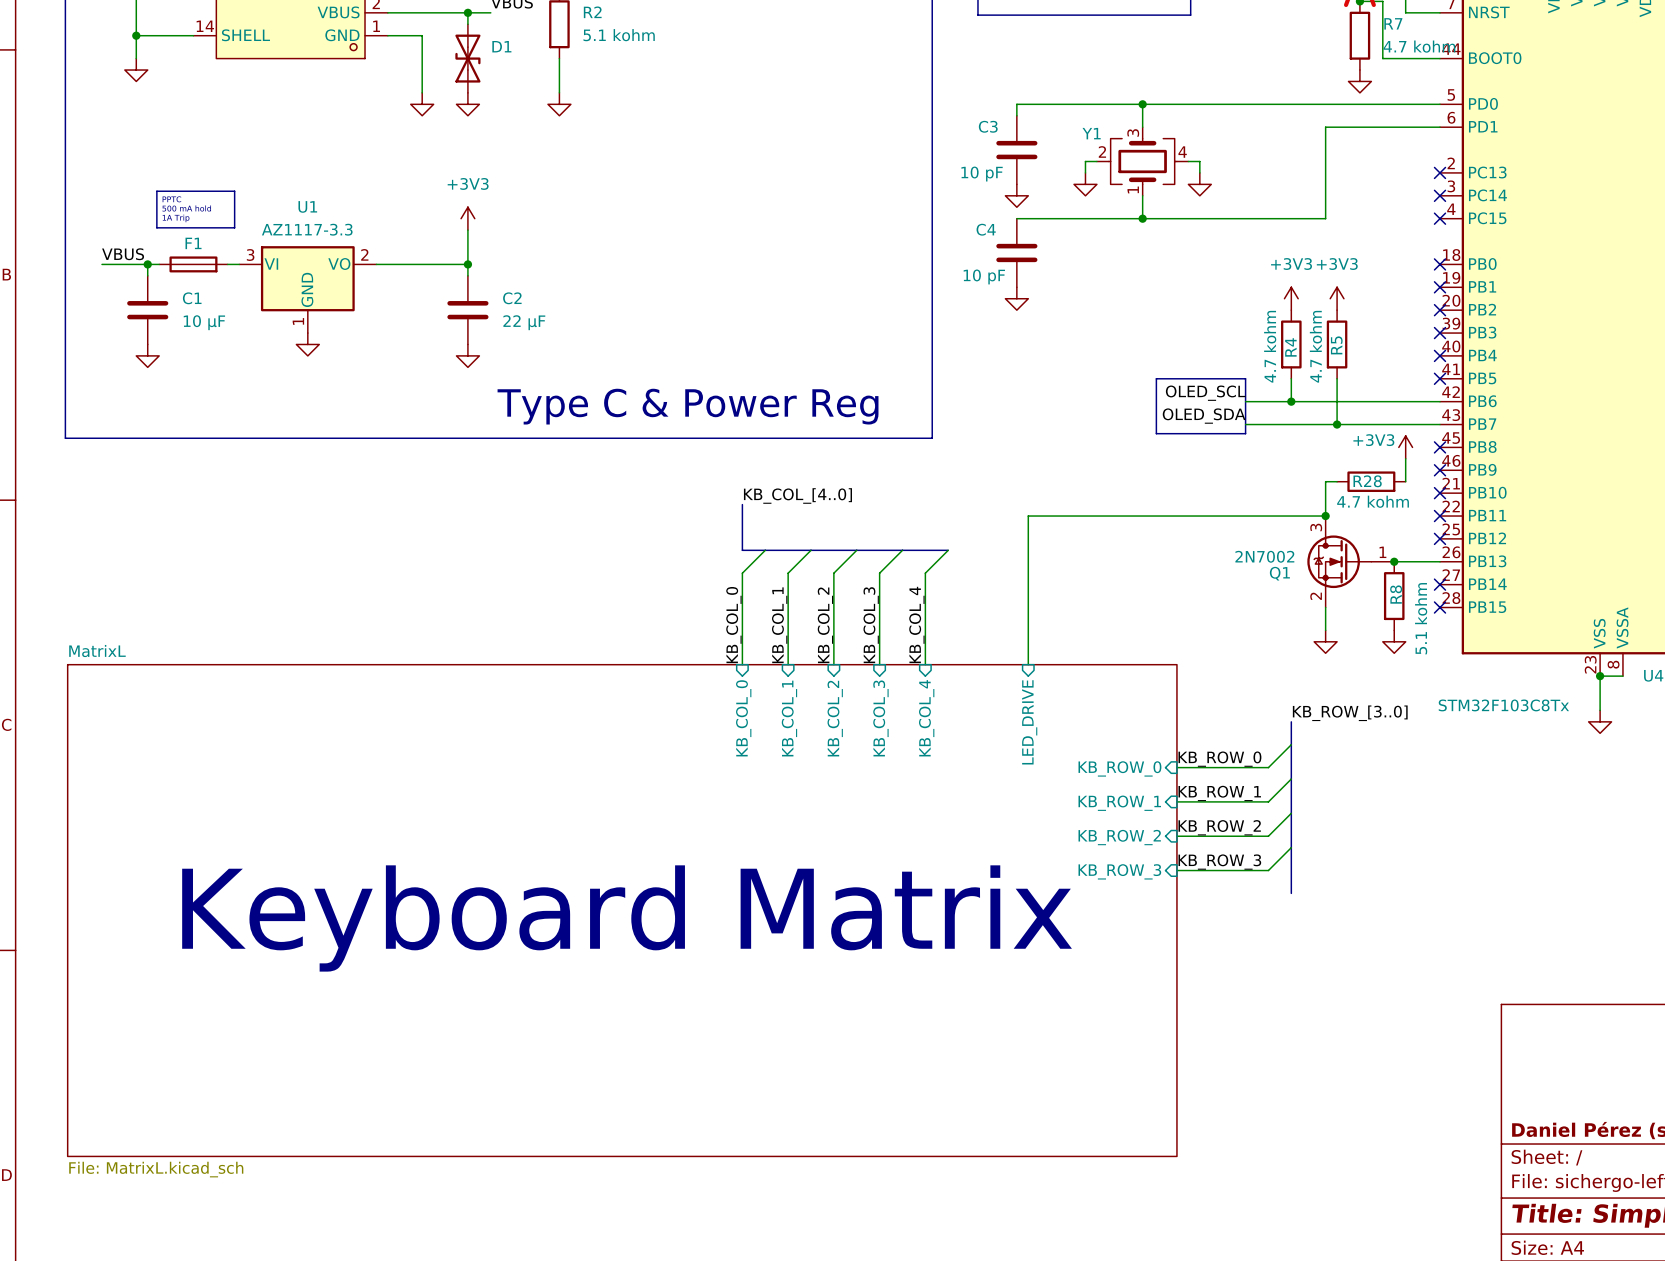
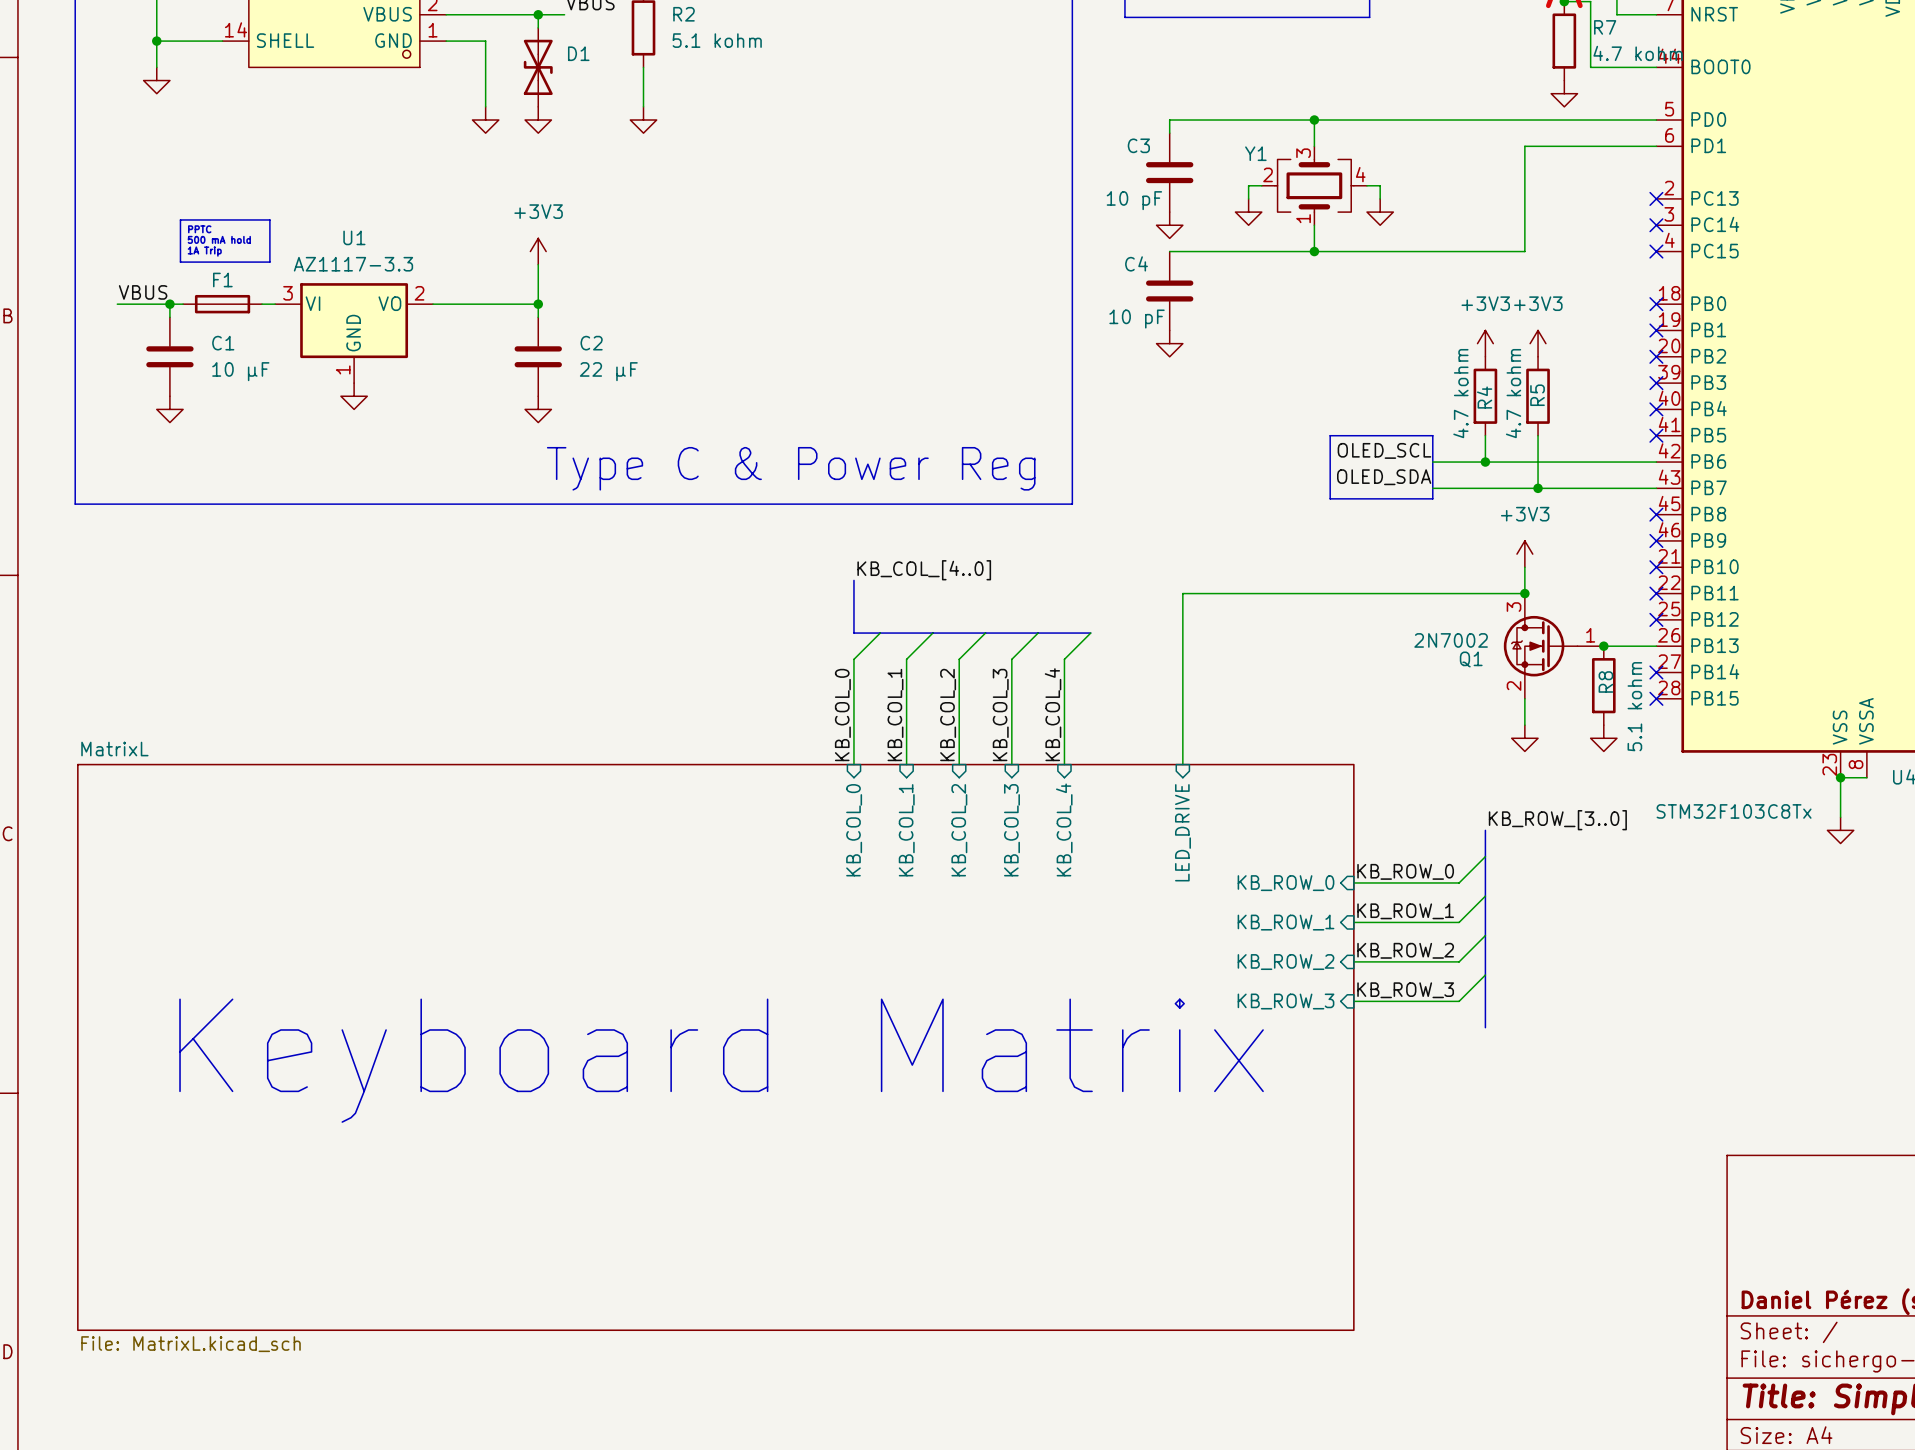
power symbol text position: +3V3 (1373, 440) -> +3V3 (1525, 514)
power symbol position: +3V3 (1405, 447) -> +3V3 (1524, 554)
wire: (1405, 458) (1405, 481) -> none
R28: 4.7 kohm (1371, 481) -> none

